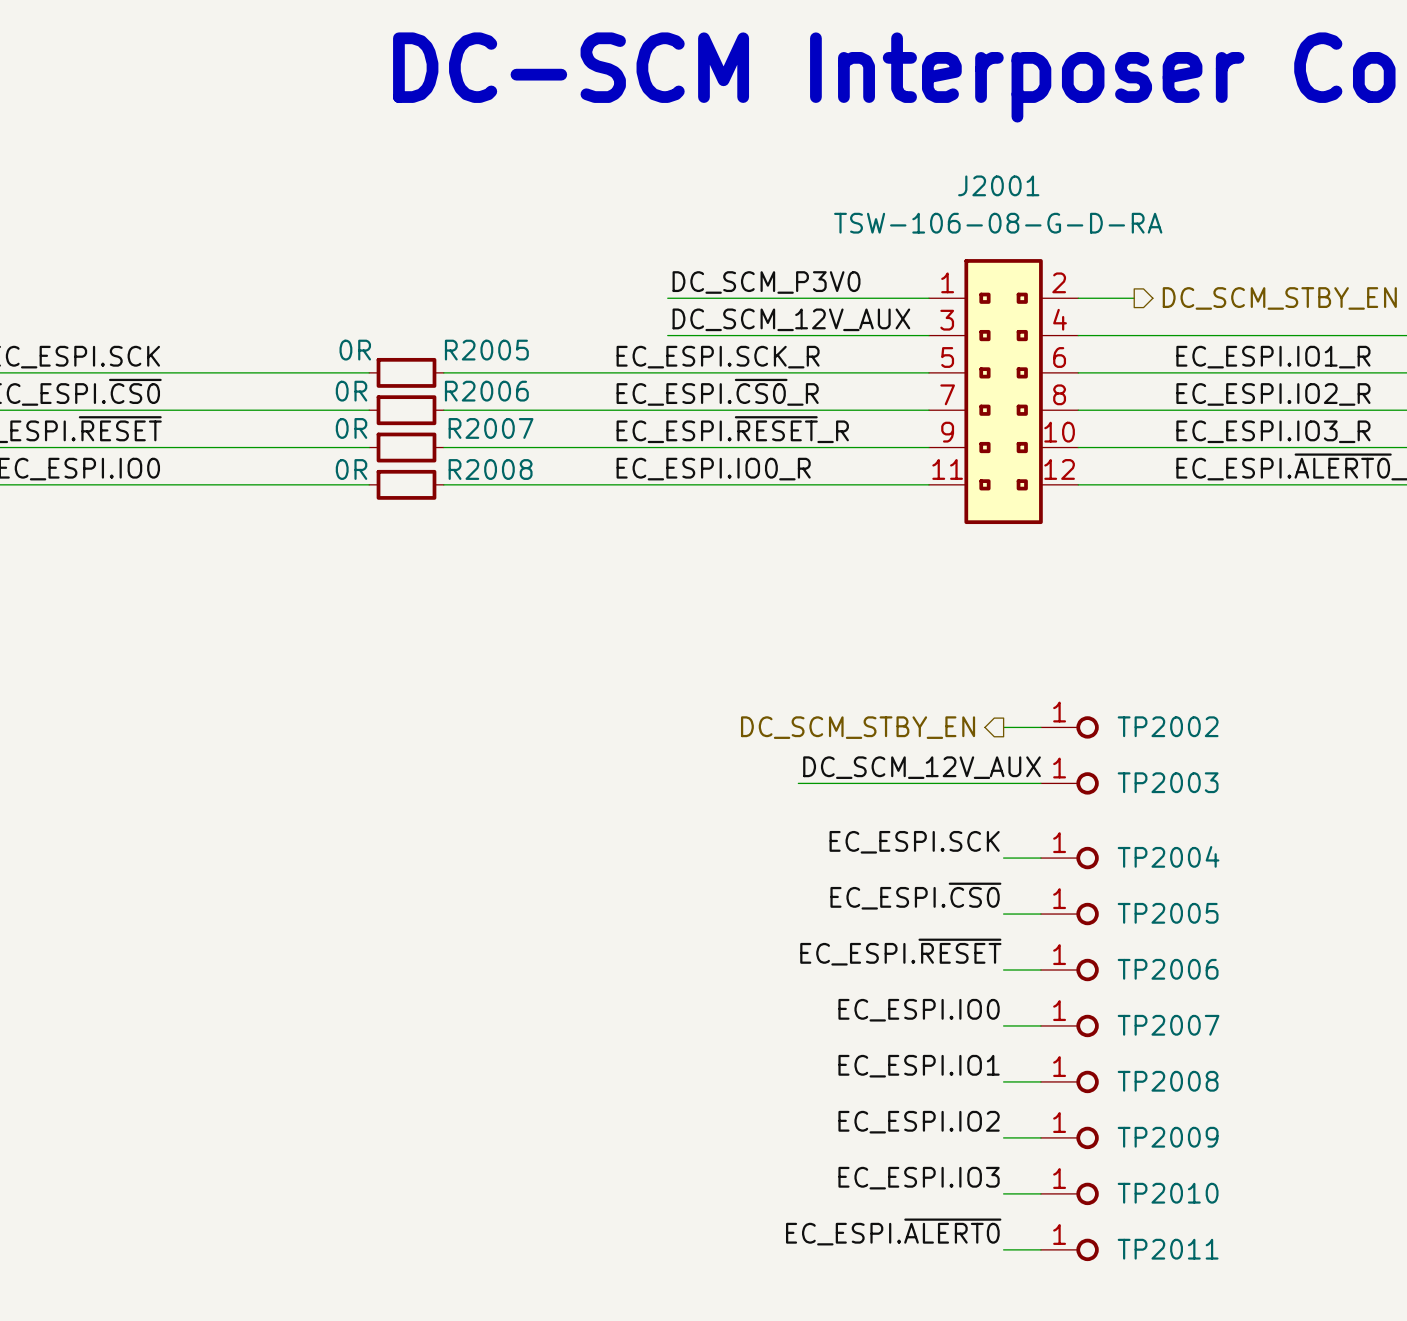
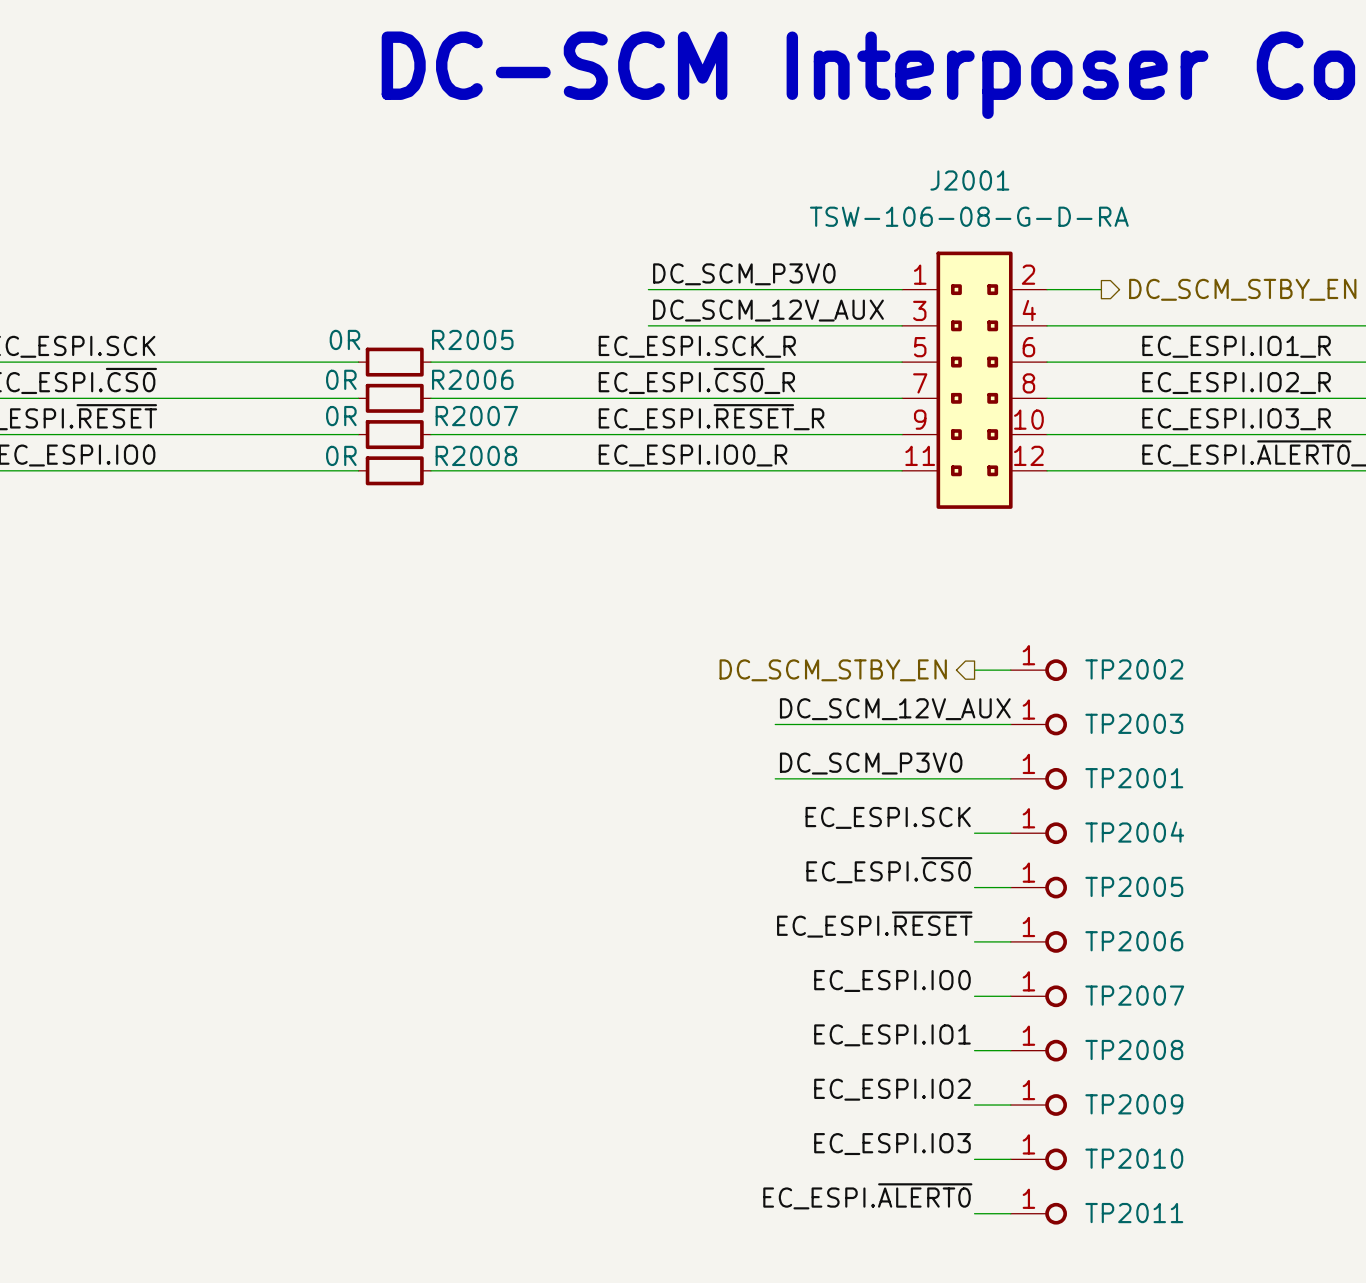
hierarchical label position: DC_SCM_STBY_EN (858, 727) -> DC_SCM_STBY_EN (833, 670)
wire: (1003, 727) (1040, 727) -> (974, 670) (1010, 670)
TP2002 position: (1069, 727) -> (1038, 670)
label position: DC_SCM_12V_AUX (922, 767) -> DC_SCM_12V_AUX (895, 709)
wire: (798, 783) (1040, 783) -> (775, 724) (1010, 724)
TP2003 position: (1069, 783) -> (1038, 724)
label: none -> DC_SCM_P3V0 (871, 763)
wire: none -> (775, 778) (1010, 778)
TP2001: none -> (1038, 778)

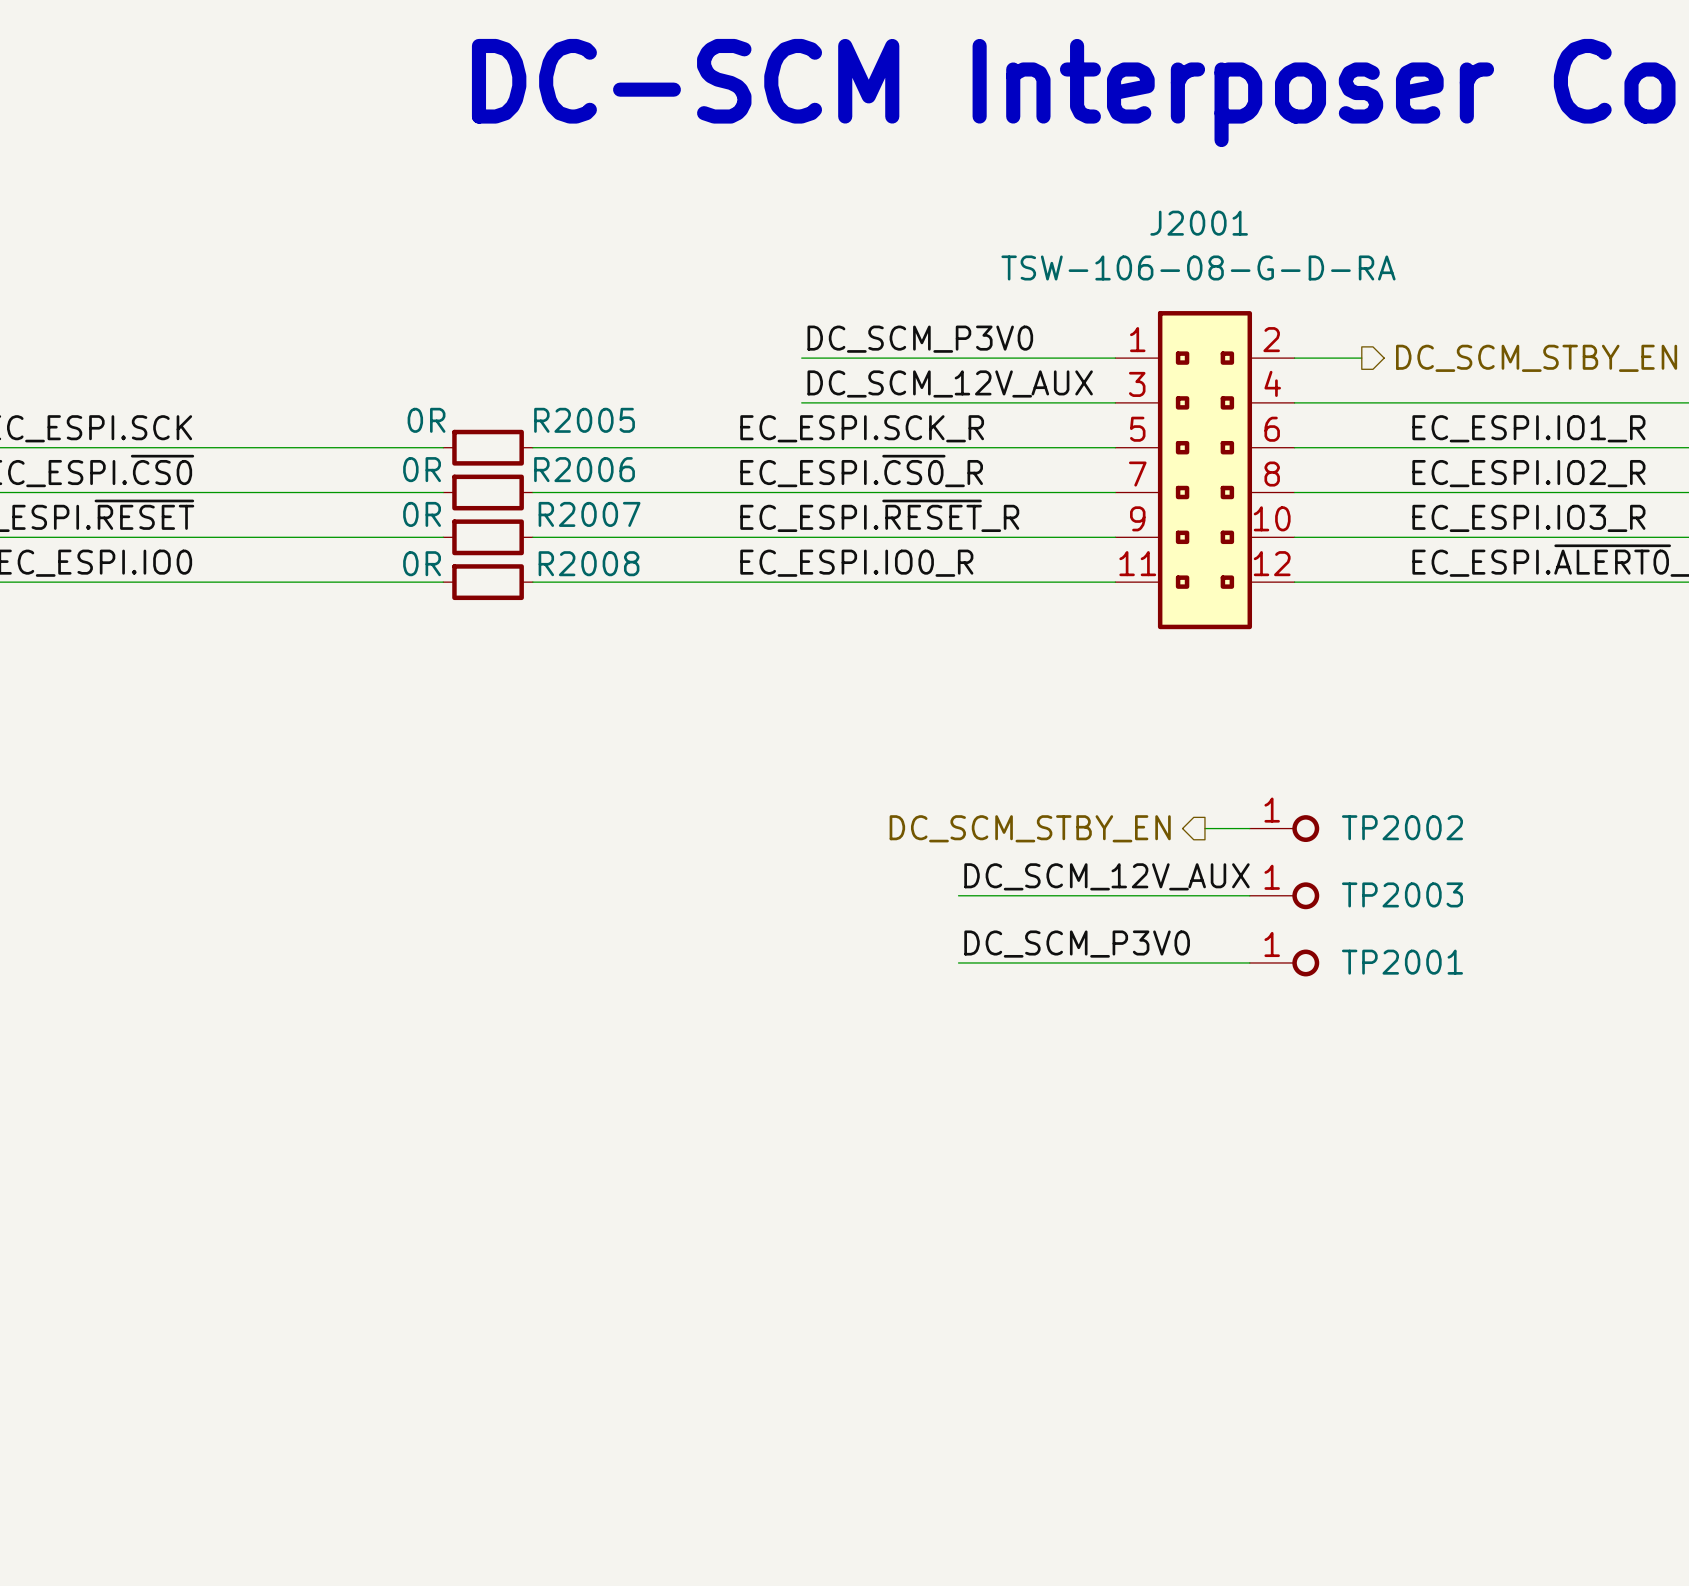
label: EC_ESPI.SCK (888, 817) -> none
wire: (974, 833) (1010, 833) -> none
TP2004: (1038, 833) -> none
label: EC_ESPI.~{CS0} (889, 870) -> none
wire: (974, 887) (1010, 887) -> none
TP2005: (1038, 887) -> none
label: EC_ESPI.~{RESET} (874, 924) -> none
wire: (974, 941) (1010, 941) -> none
TP2006: (1038, 941) -> none
label: EC_ESPI.IO0 (892, 980) -> none
wire: (974, 996) (1010, 996) -> none
TP2007: (1038, 996) -> none
label: EC_ESPI.IO1 (892, 1035) -> none
wire: (974, 1050) (1010, 1050) -> none
TP2008: (1038, 1050) -> none
label: EC_ESPI.IO2 (892, 1089) -> none
wire: (974, 1105) (1010, 1105) -> none
TP2009: (1038, 1105) -> none
label: EC_ESPI.IO3 (892, 1144) -> none
wire: (974, 1159) (1010, 1159) -> none
TP2010: (1038, 1159) -> none
label: EC_ESPI.~{ALERT0} (867, 1196) -> none
wire: (974, 1213) (1010, 1213) -> none
TP2011: (1038, 1213) -> none

